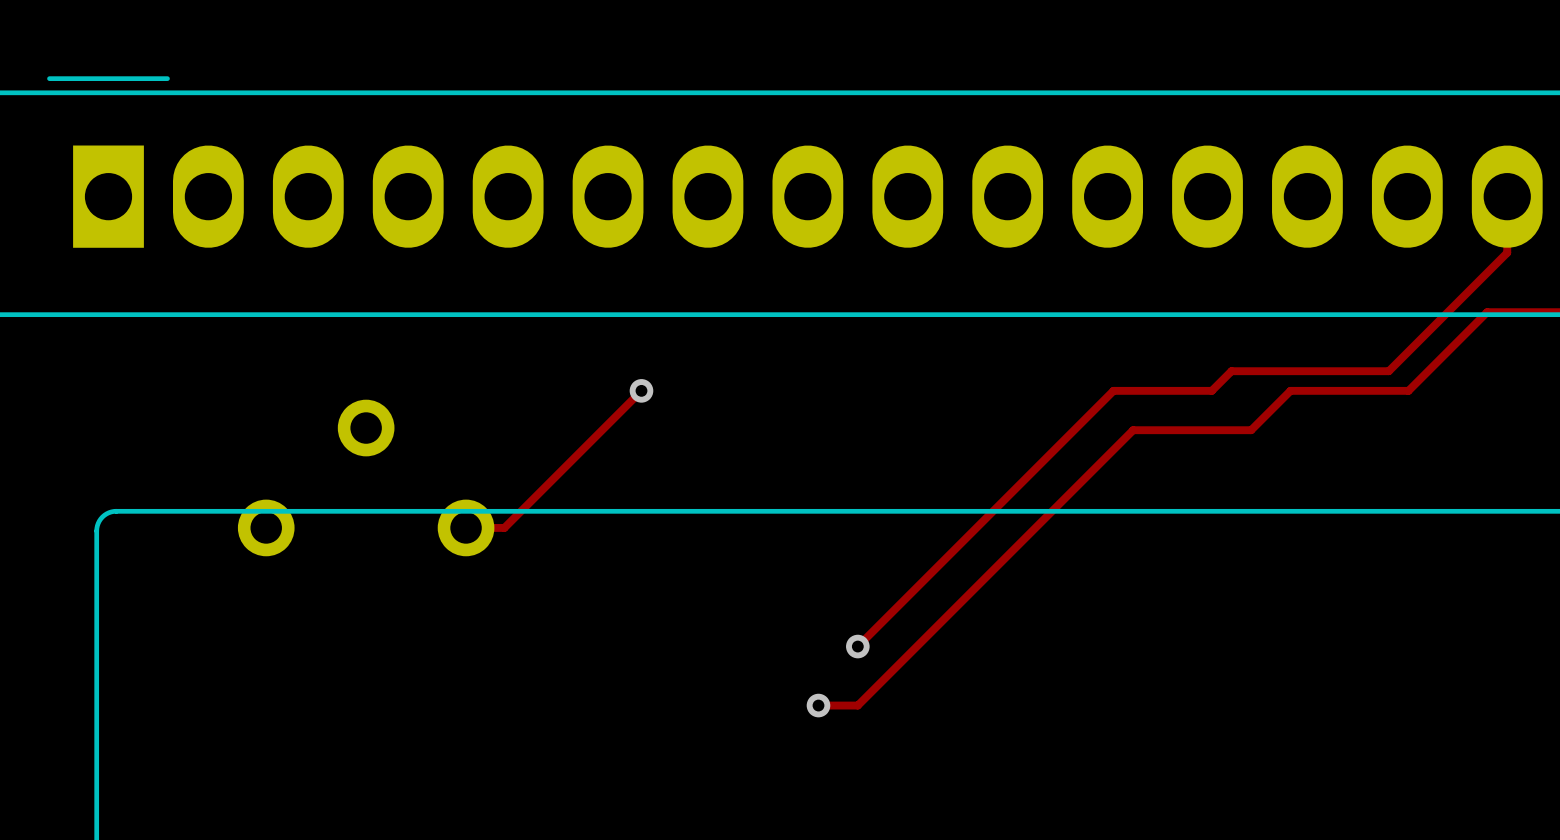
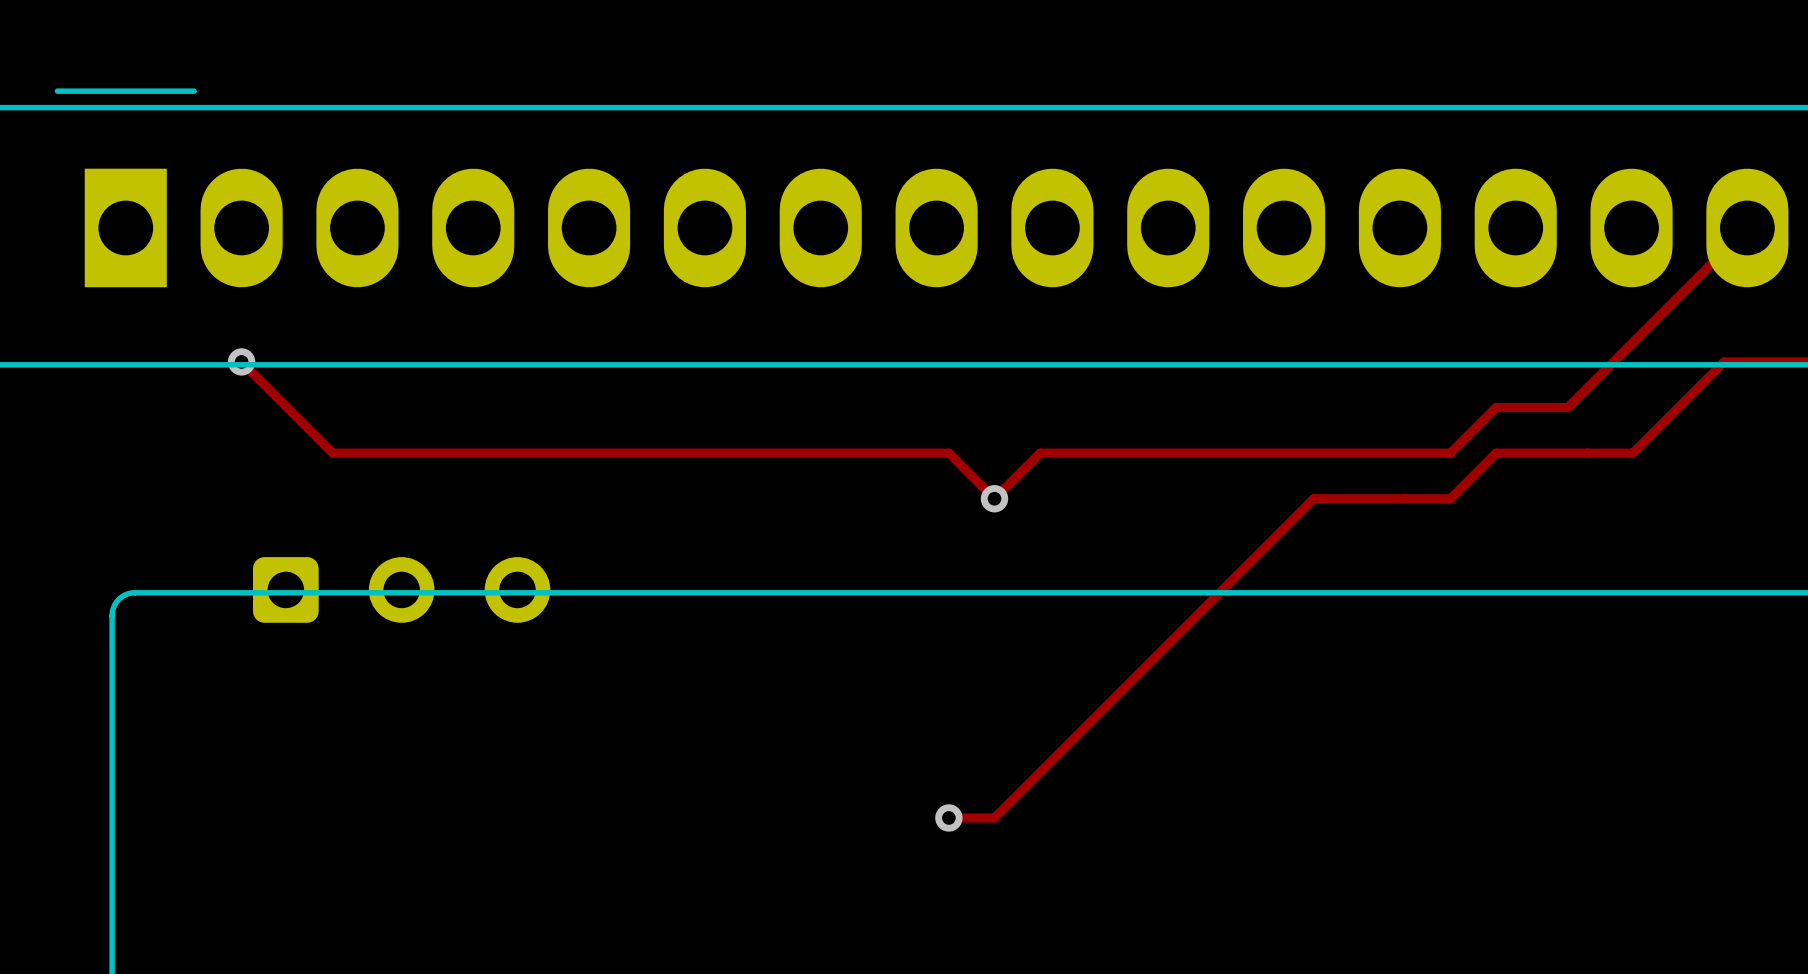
track: (1507, 196) (1507, 252) (1388, 371) (1231, 371) (1211, 390) -> (1747, 227) (1567, 407) (1496, 407) (1450, 453) (1404, 453)
via: none -> (241, 361)
track: (641, 390) (504, 527) (465, 527) -> none
via: (641, 390) -> none
track: (1113, 390) (857, 646) -> (1290, 453) (1040, 453) (994, 498) (948, 453) (332, 453) (241, 361)
part footprint: [237, 399, 495, 557] -> [253, 557, 551, 623]
via: none -> (994, 498)
via: (857, 646) -> none

